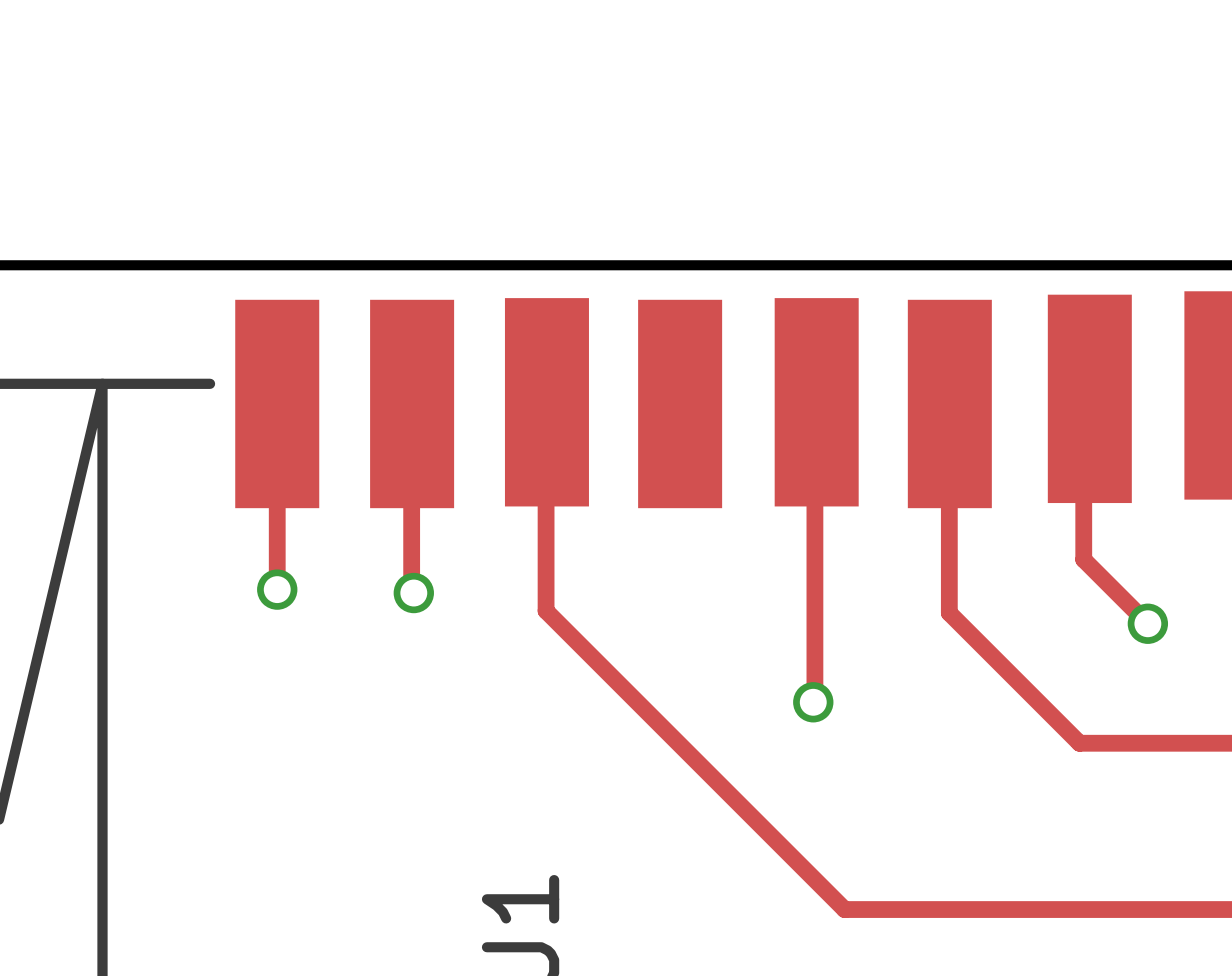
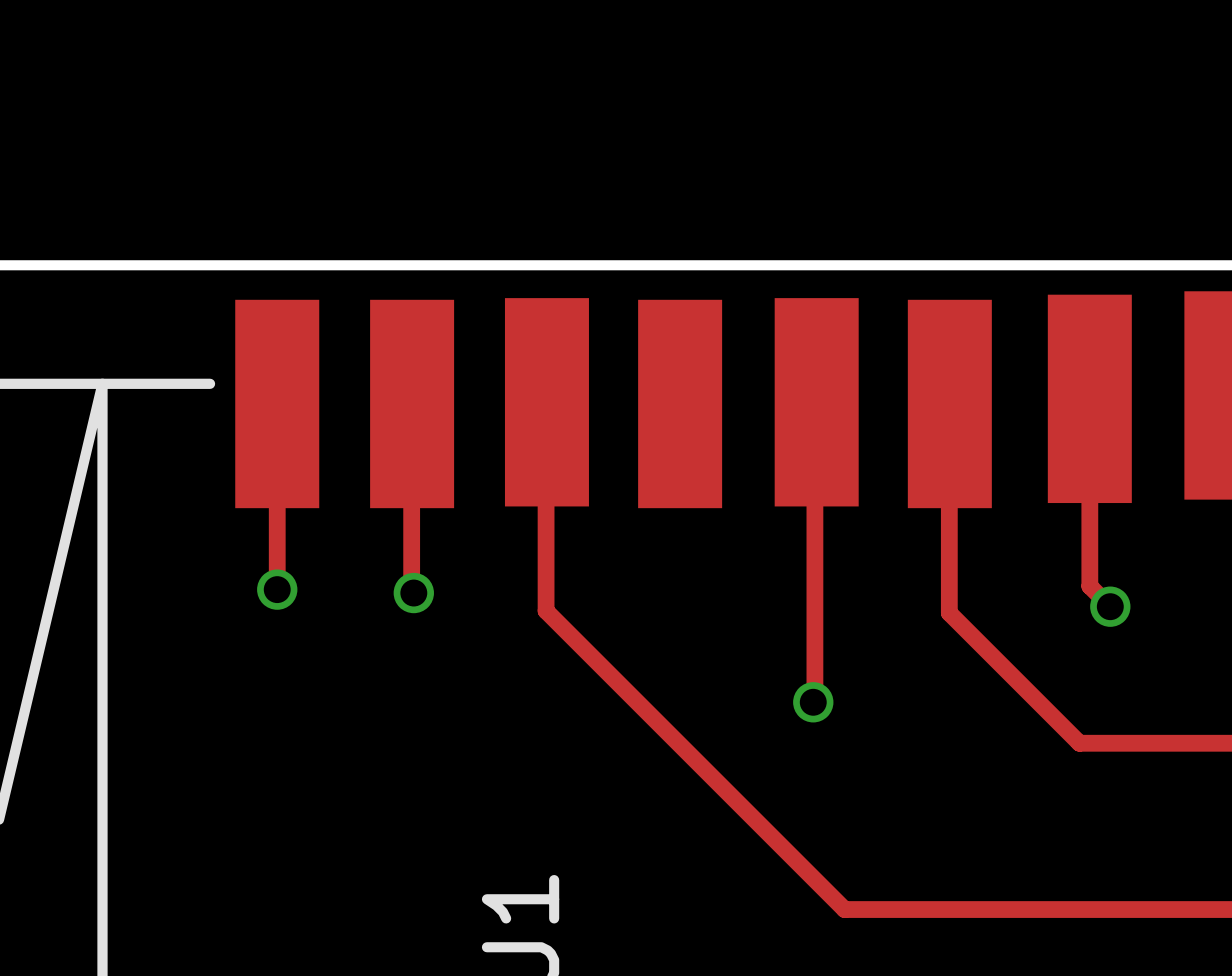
track: none -> (1089, 445) (1089, 586) (1110, 606)
track: (1083, 451) (1083, 559) (1147, 623) -> none
via position: (1147, 623) -> (1110, 606)

